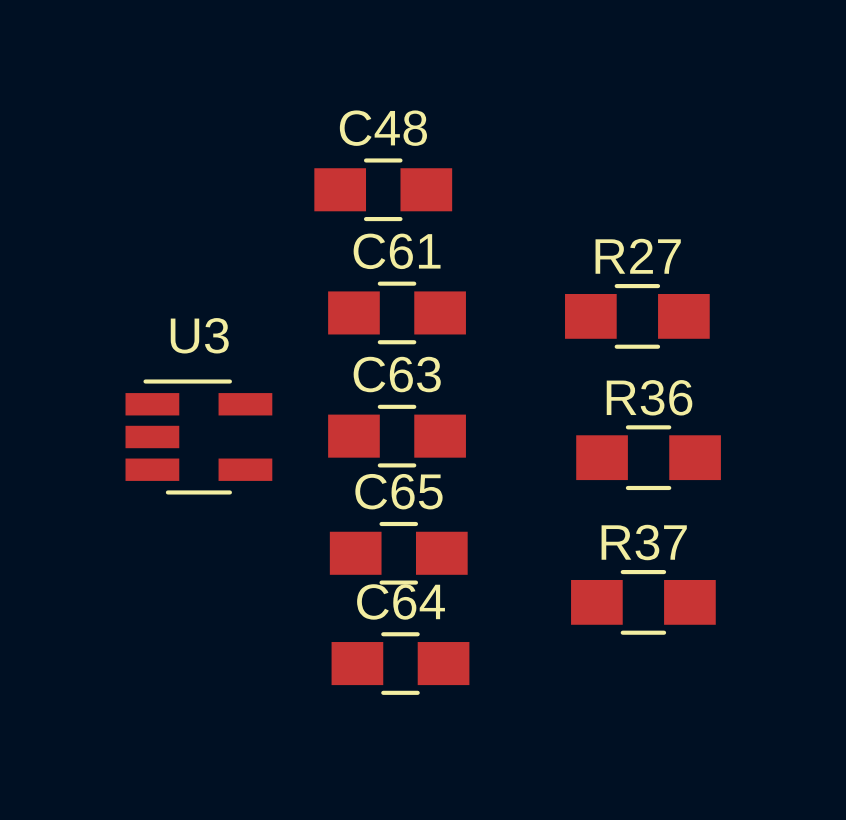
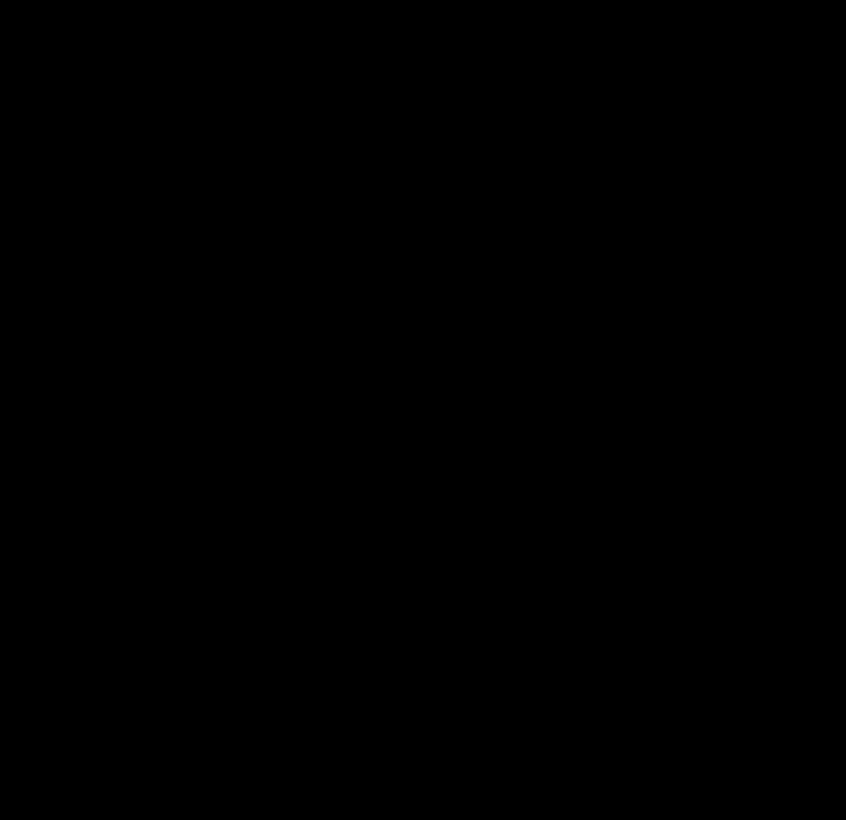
C48: (383, 189) -> none
C61: (397, 312) -> none
R27: (637, 316) -> none
U3: (198, 436) -> none
C63: (397, 436) -> none
R36: (648, 457) -> none
C65: (398, 553) -> none
R37: (643, 602) -> none
C64: (400, 663) -> none

